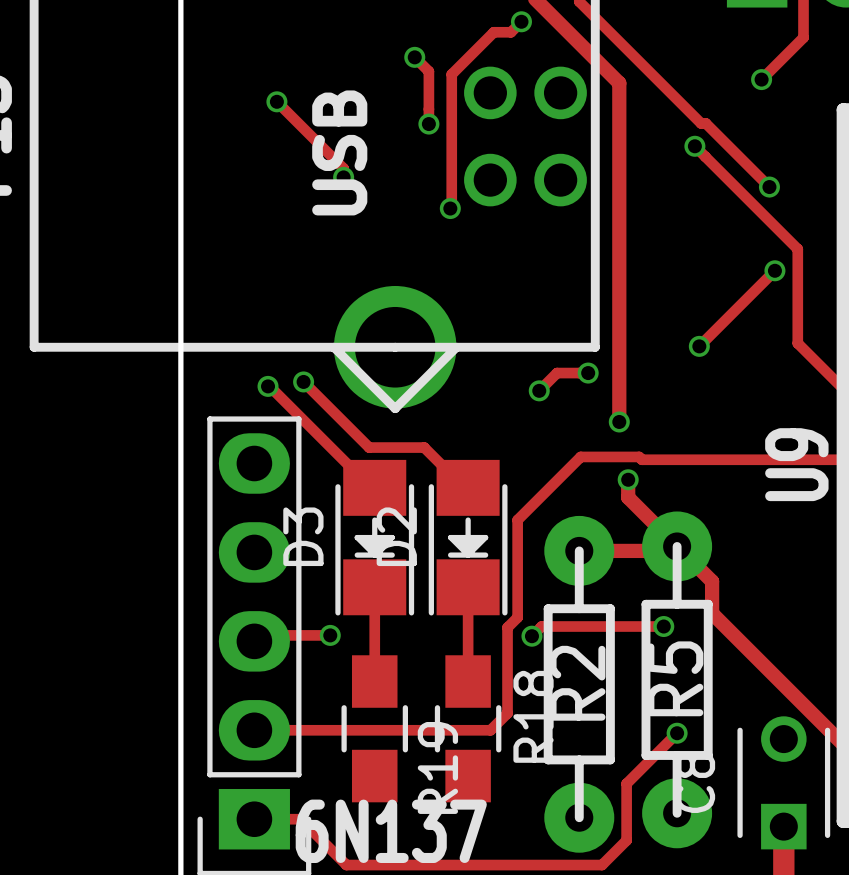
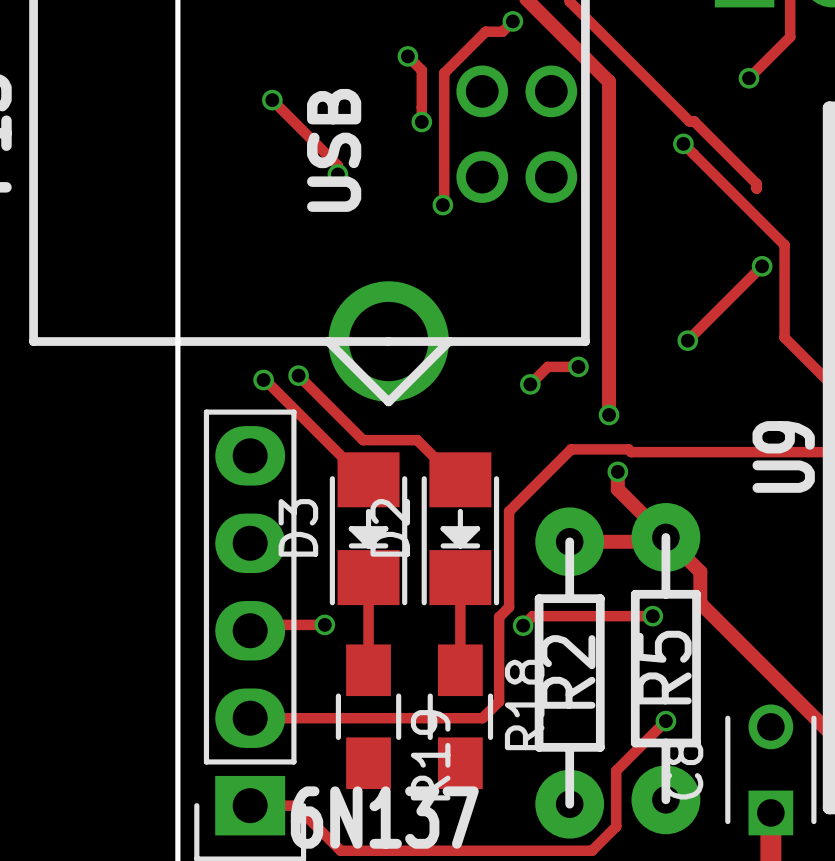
via: (769, 187) -> none

